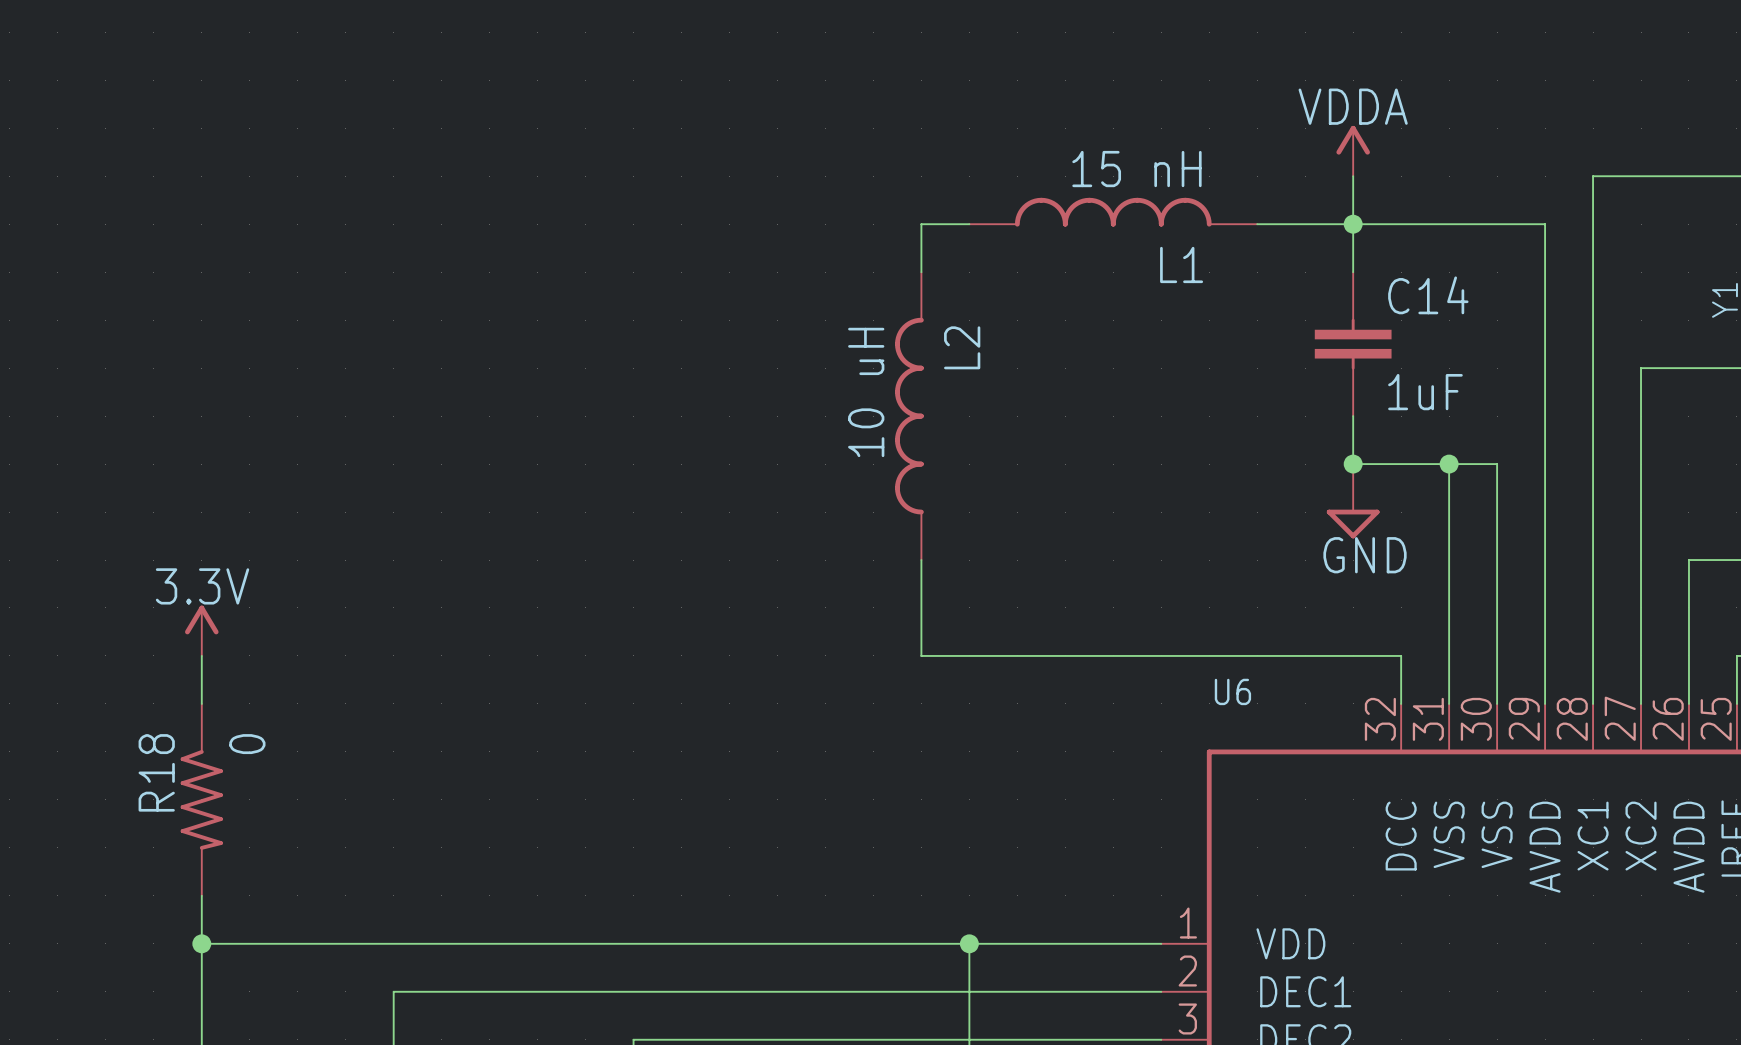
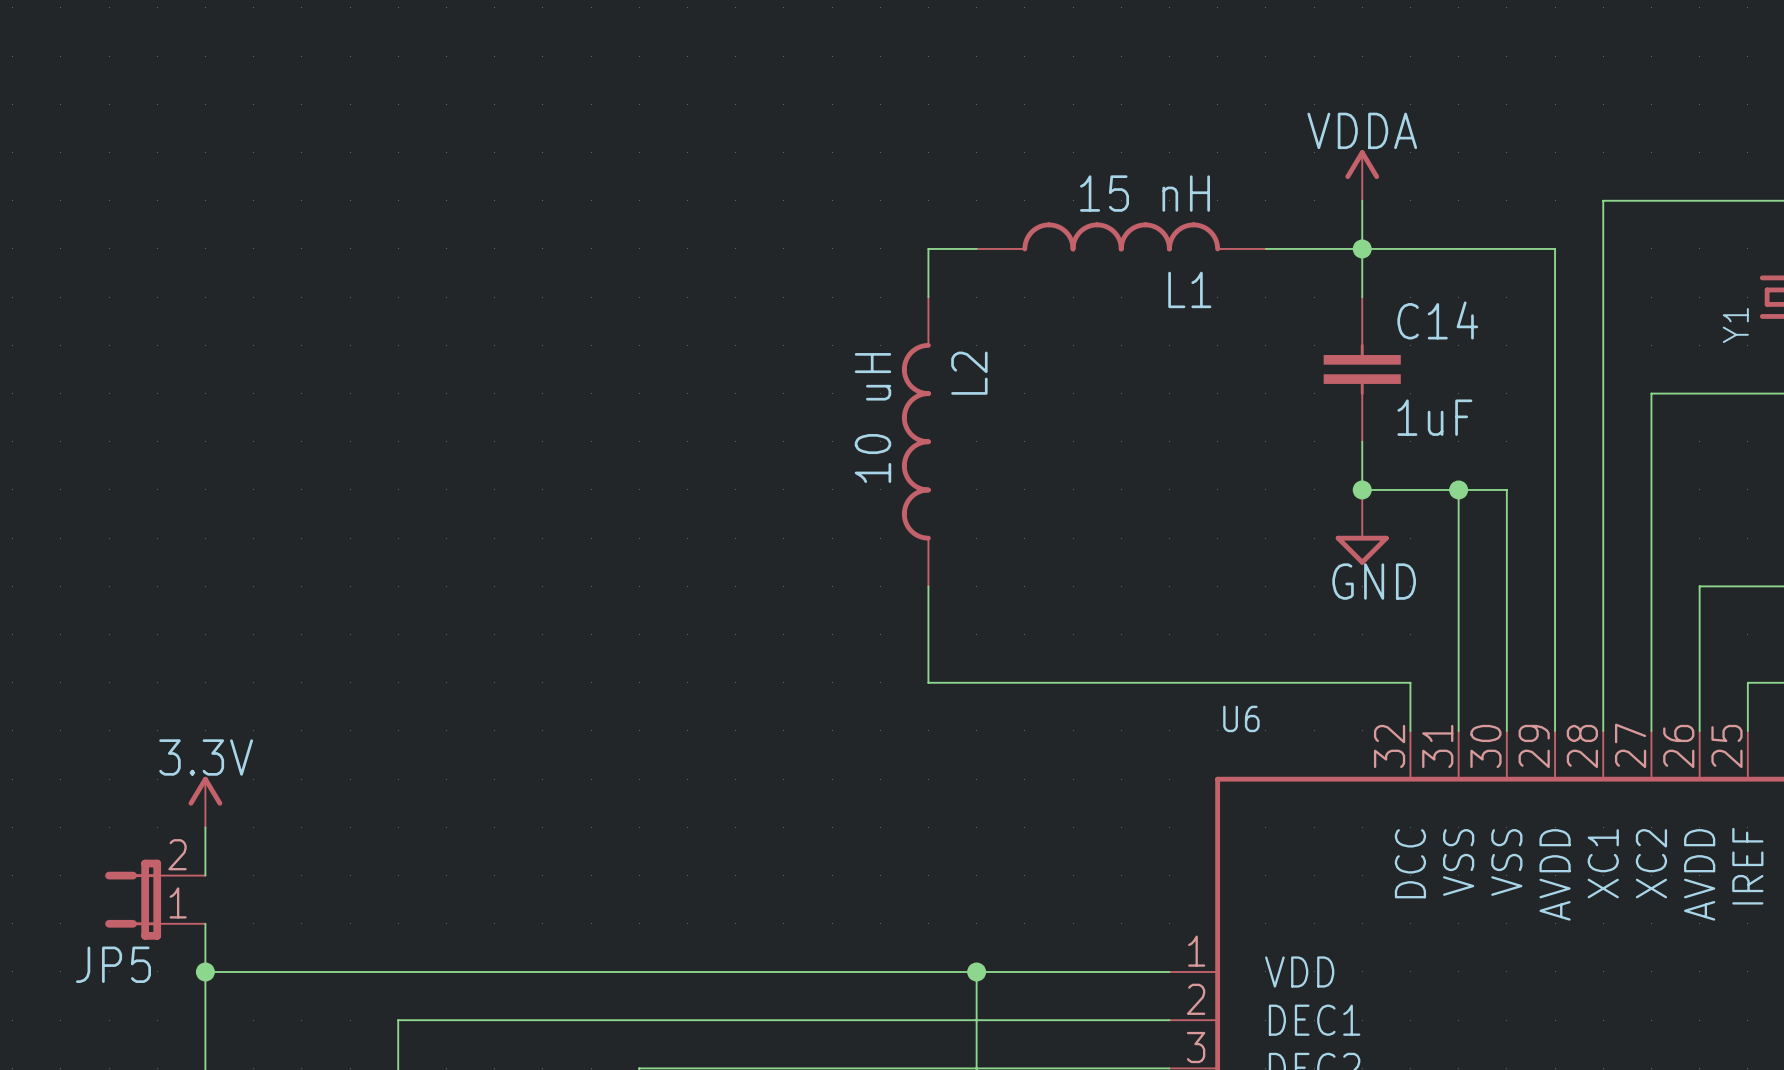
power symbol position: 3.3V (201, 630) -> 3.3V (205, 802)
wire: (201, 655) (201, 703) -> (205, 827) (205, 875)
R18: 0 (201, 799) -> none
JP5: none -> (155, 899)

